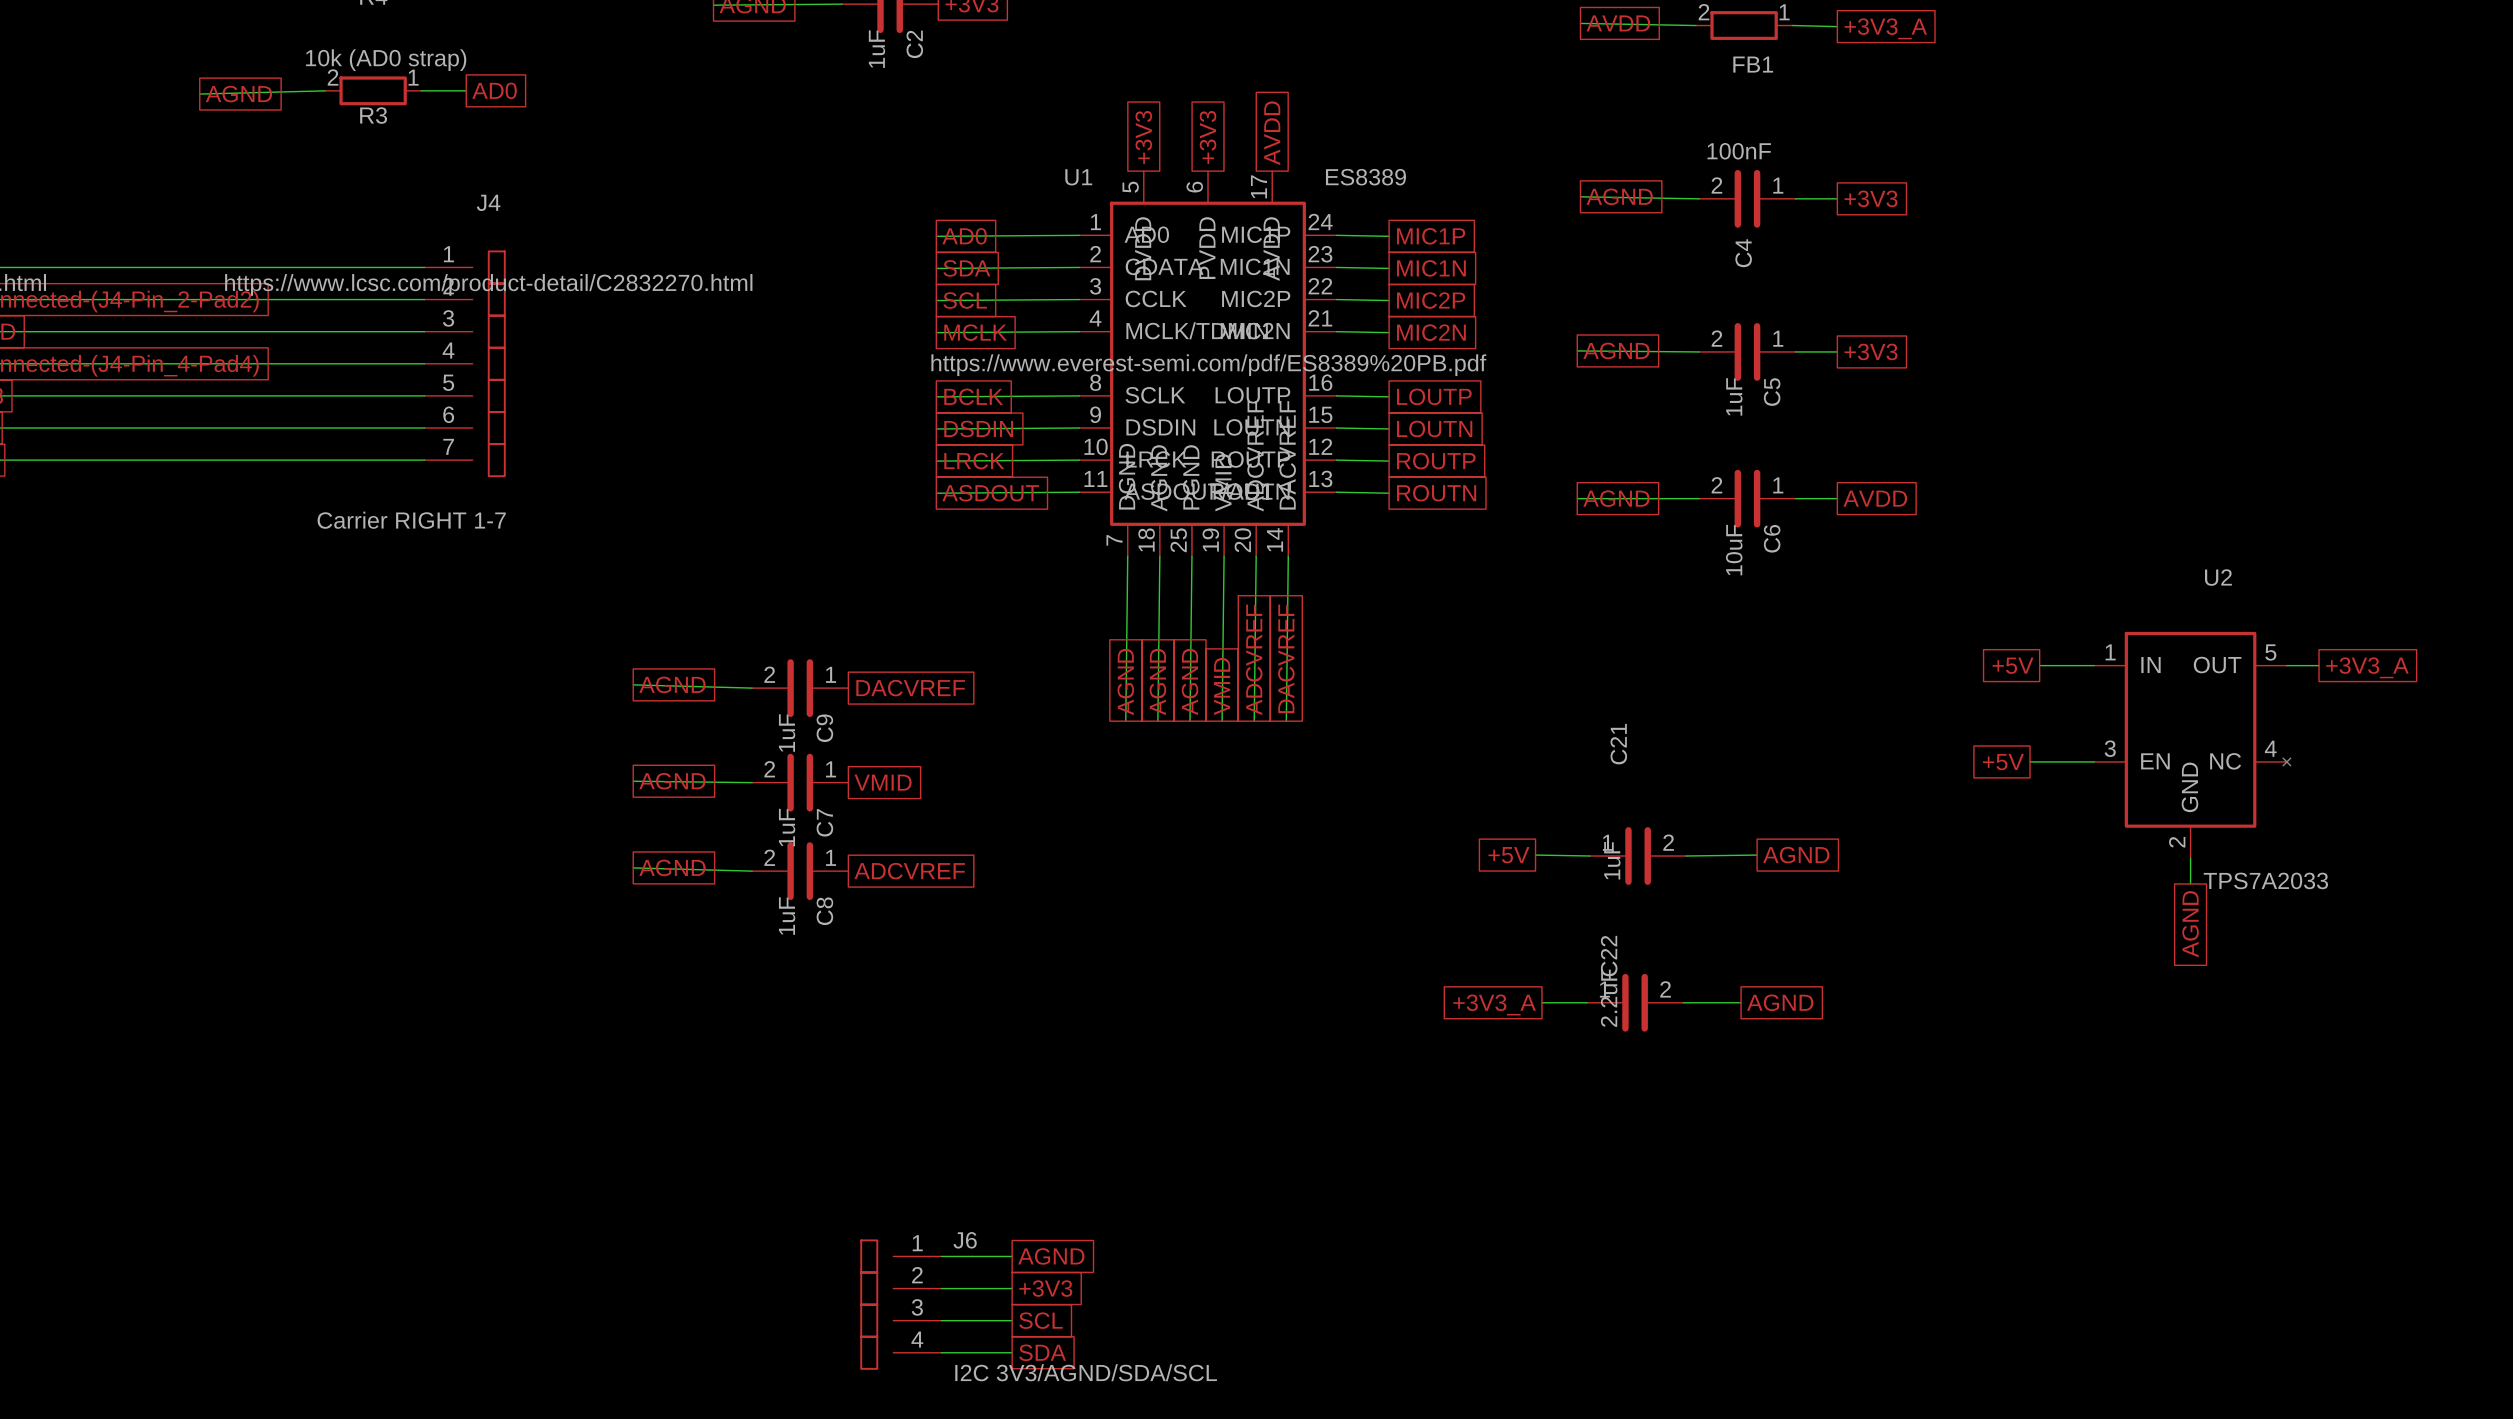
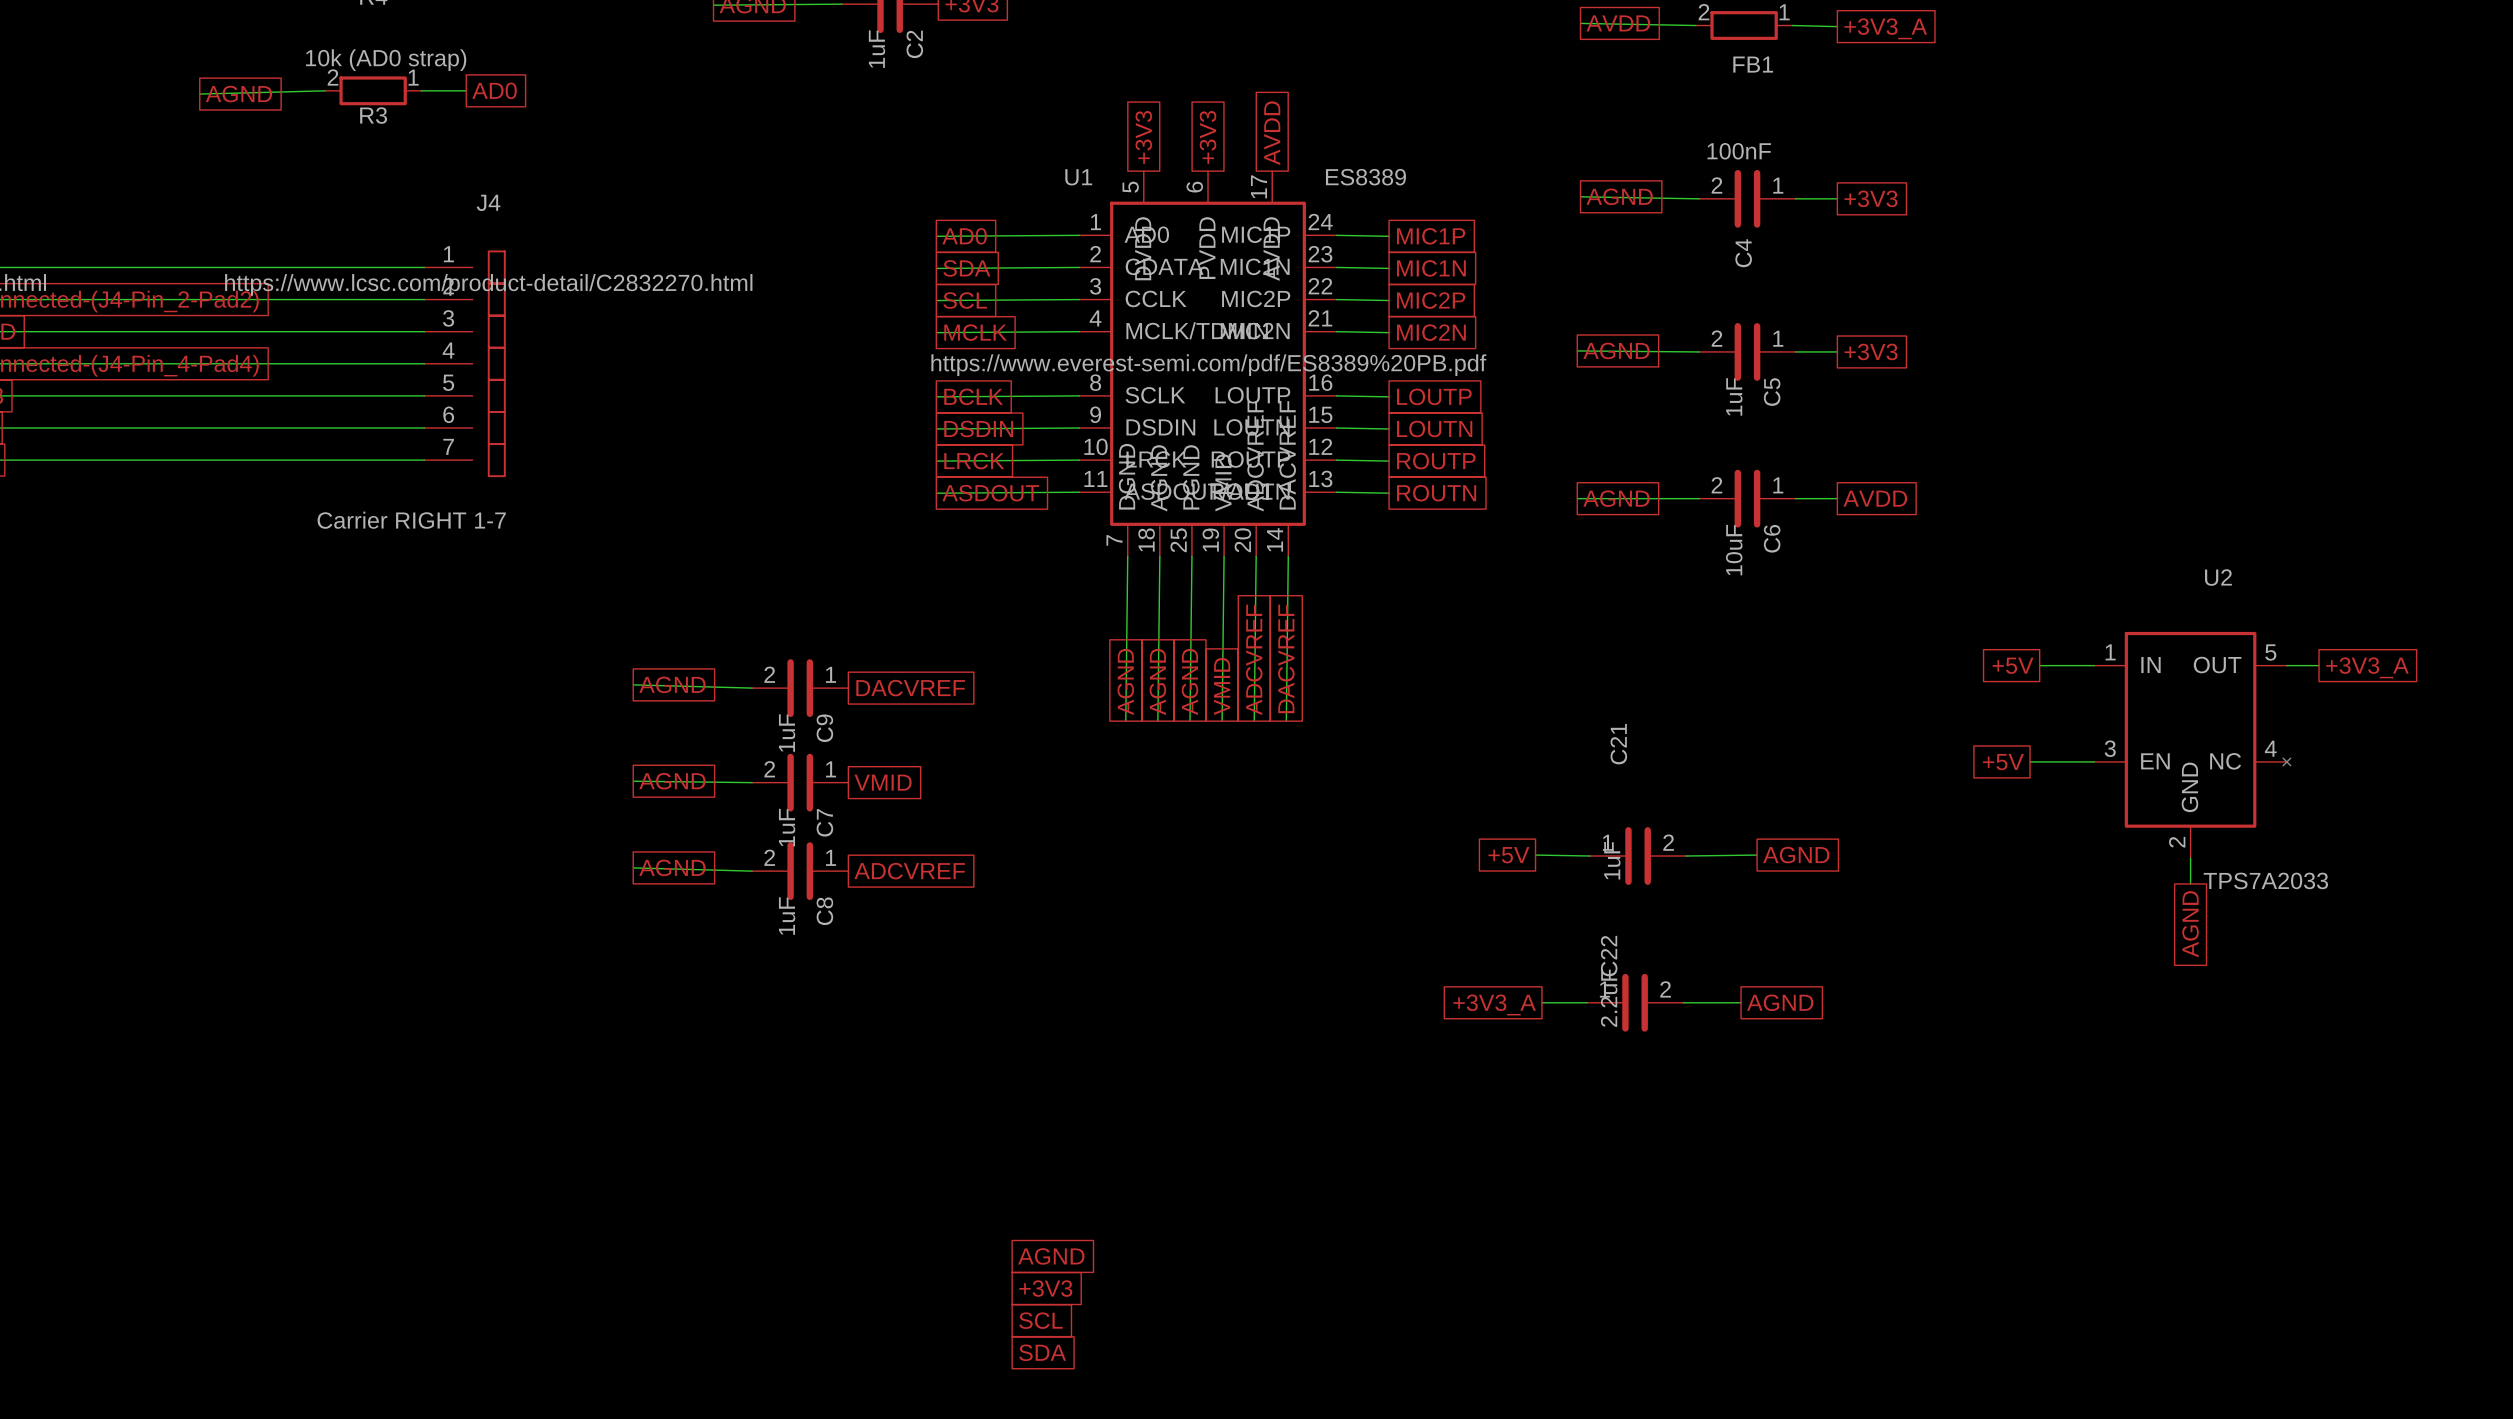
wire: (941, 1256) (1012, 1256) -> none
wire: (941, 1288) (1012, 1288) -> none
J6: I2C 3V3/AGND/SDA/SCL (900, 1304) -> none
wire: (941, 1320) (1012, 1320) -> none
wire: (941, 1352) (1012, 1352) -> none

